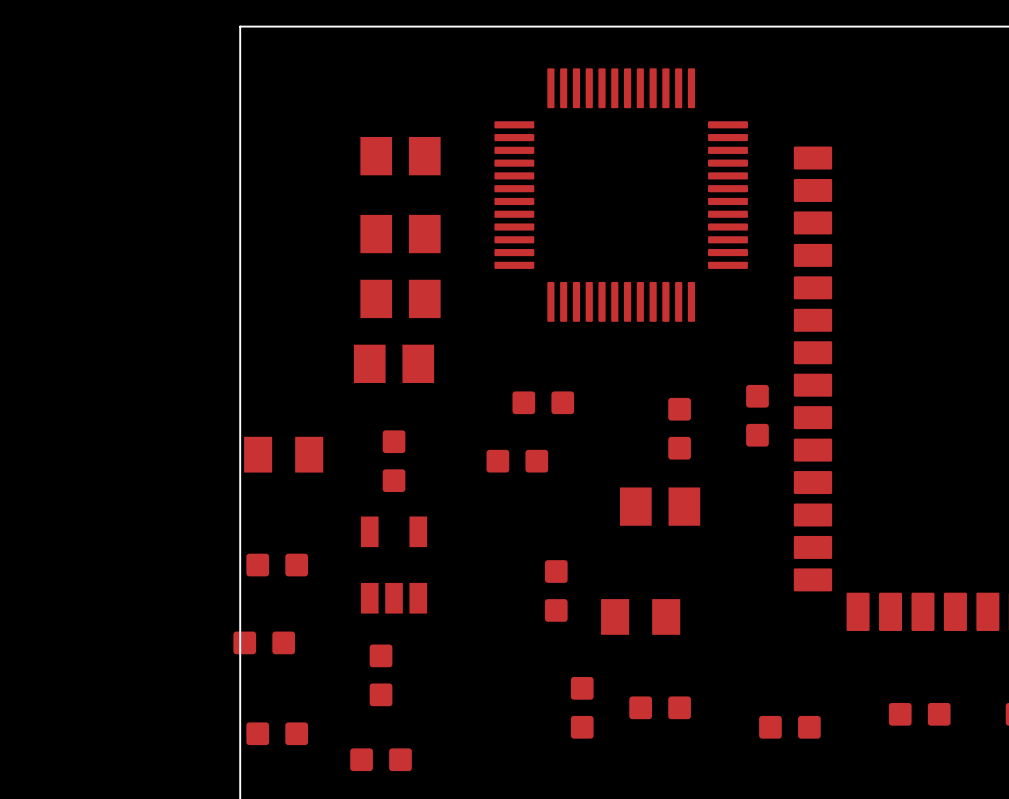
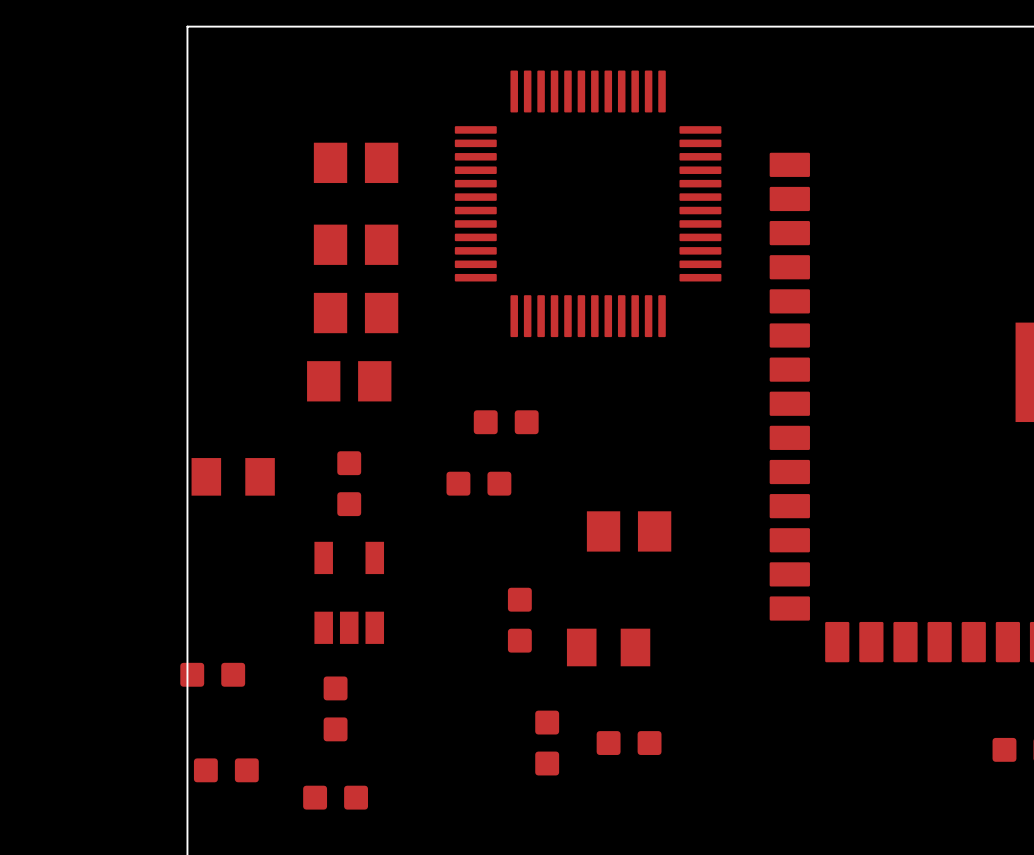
part: (757, 415) -> none
part: (679, 428) -> none
part: (277, 565) -> none
part: (919, 714) -> none
part: (789, 727) -> none

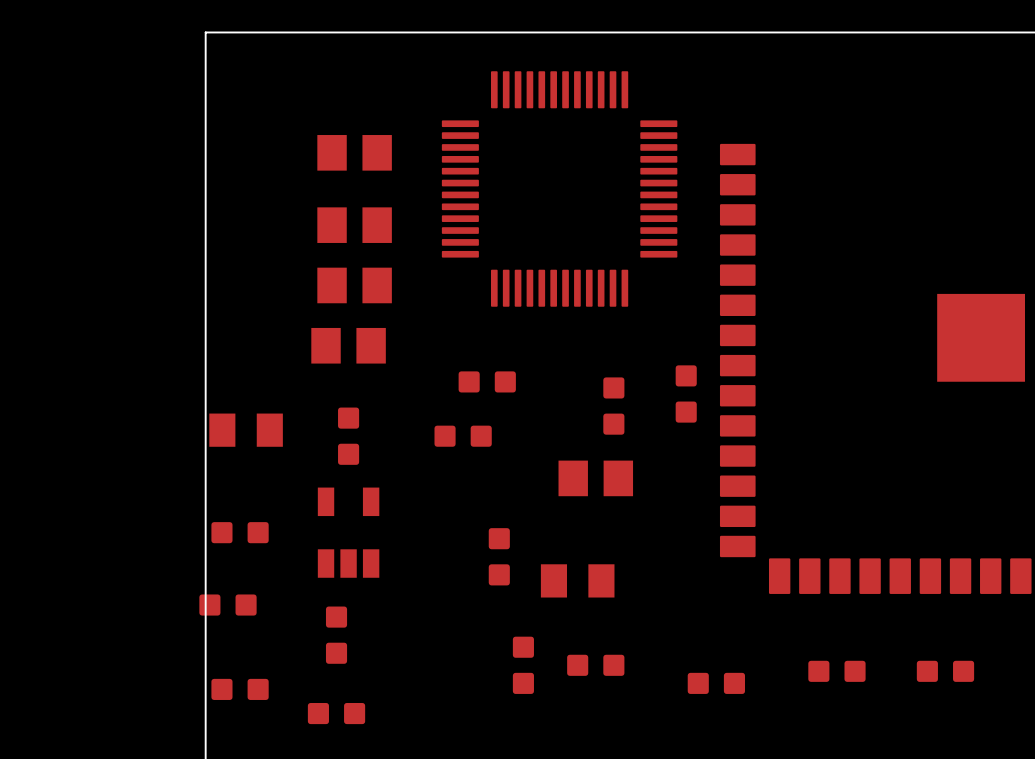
part: none -> (686, 393)
part: none -> (613, 406)
part: none -> (240, 532)
part: none -> (836, 671)
part: none -> (716, 683)

